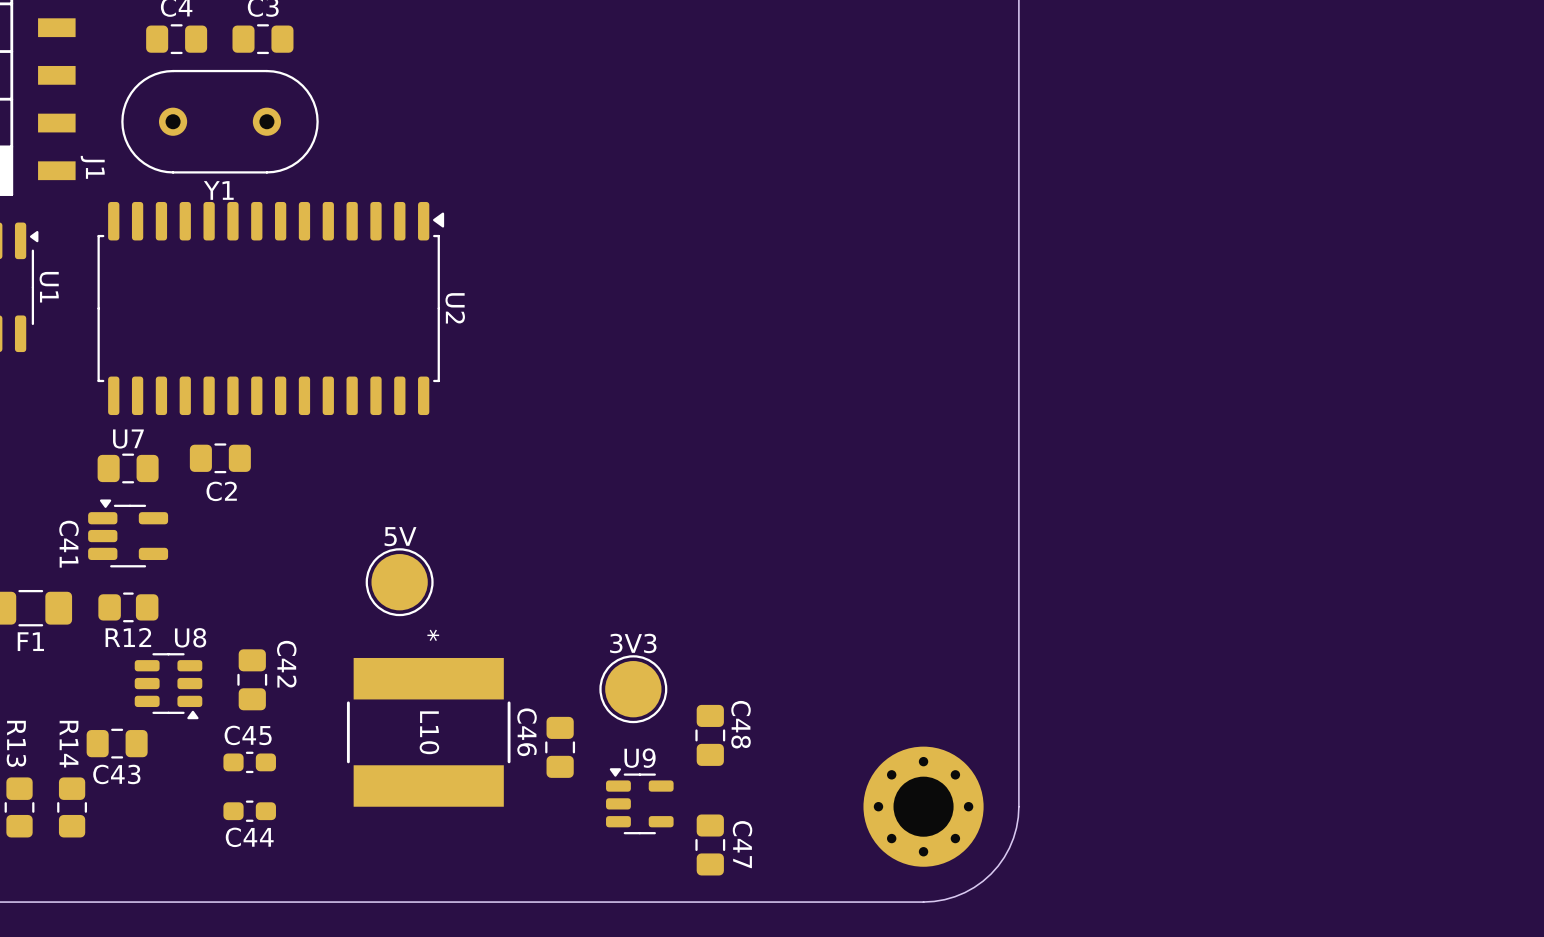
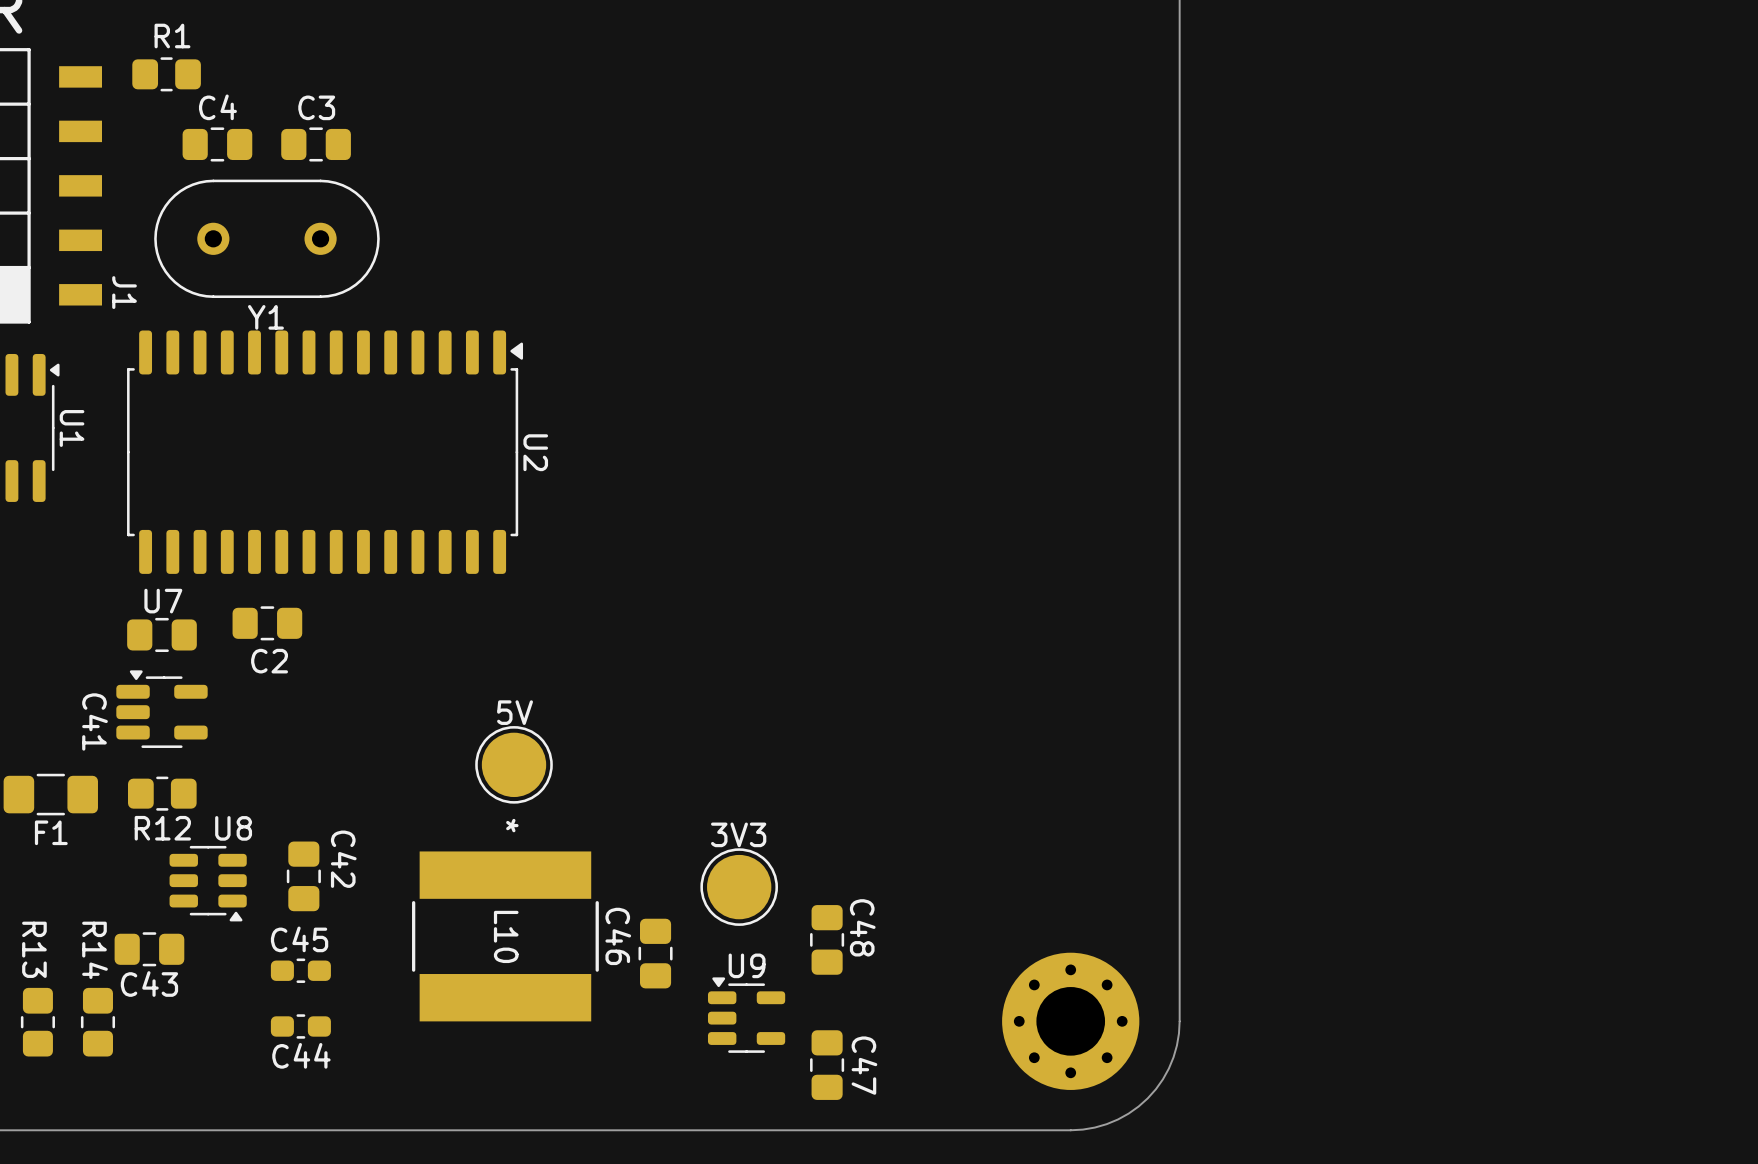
5V position: (399, 582) -> (514, 764)

